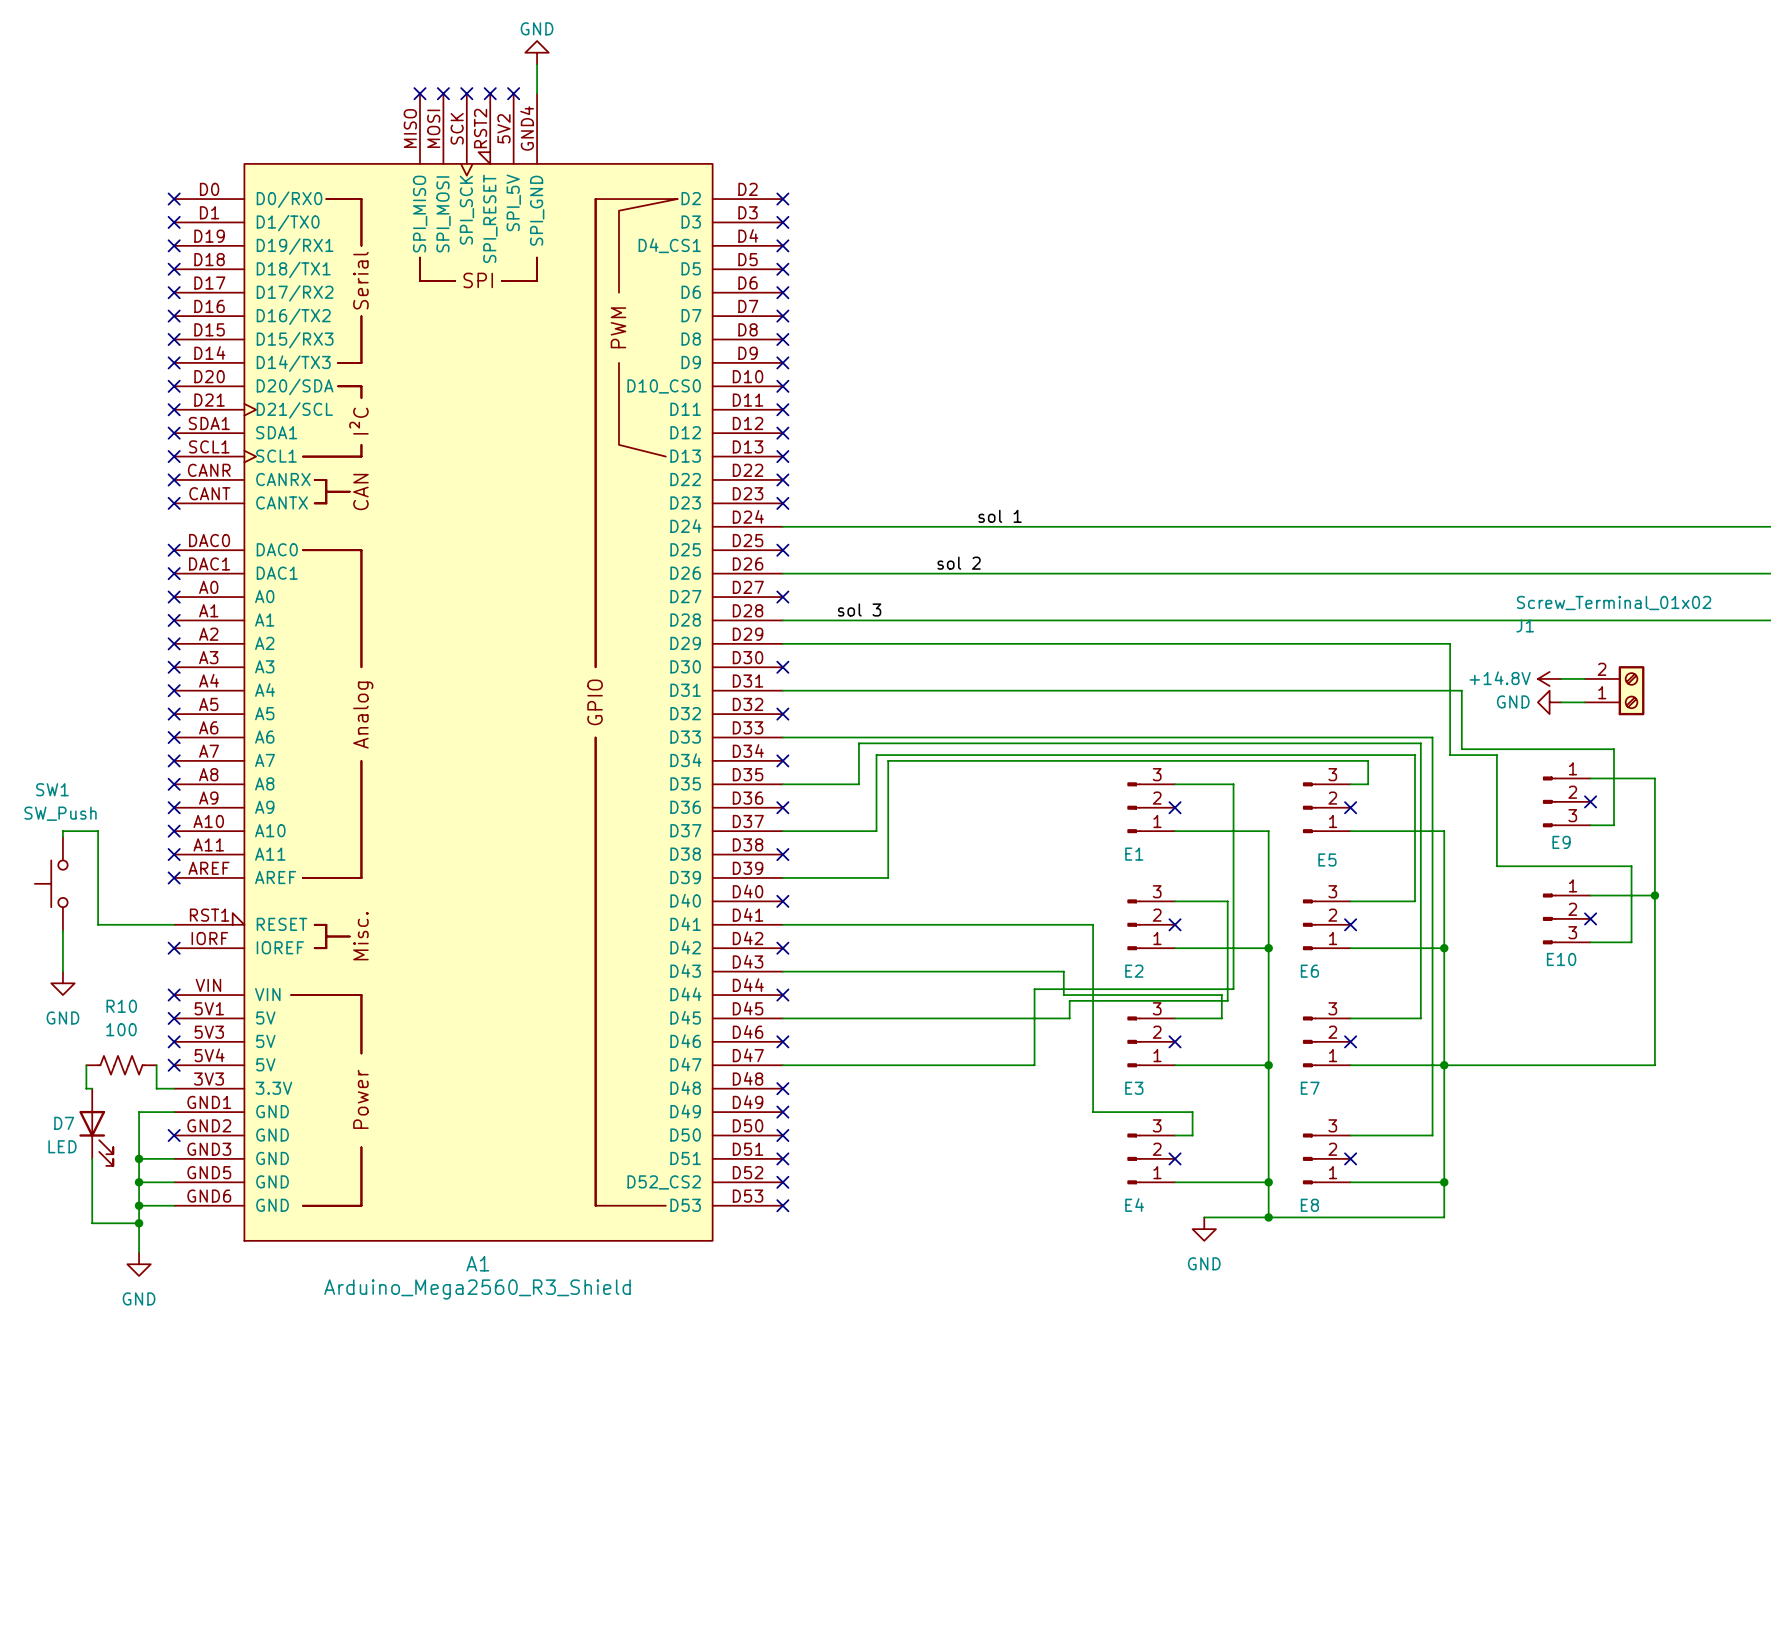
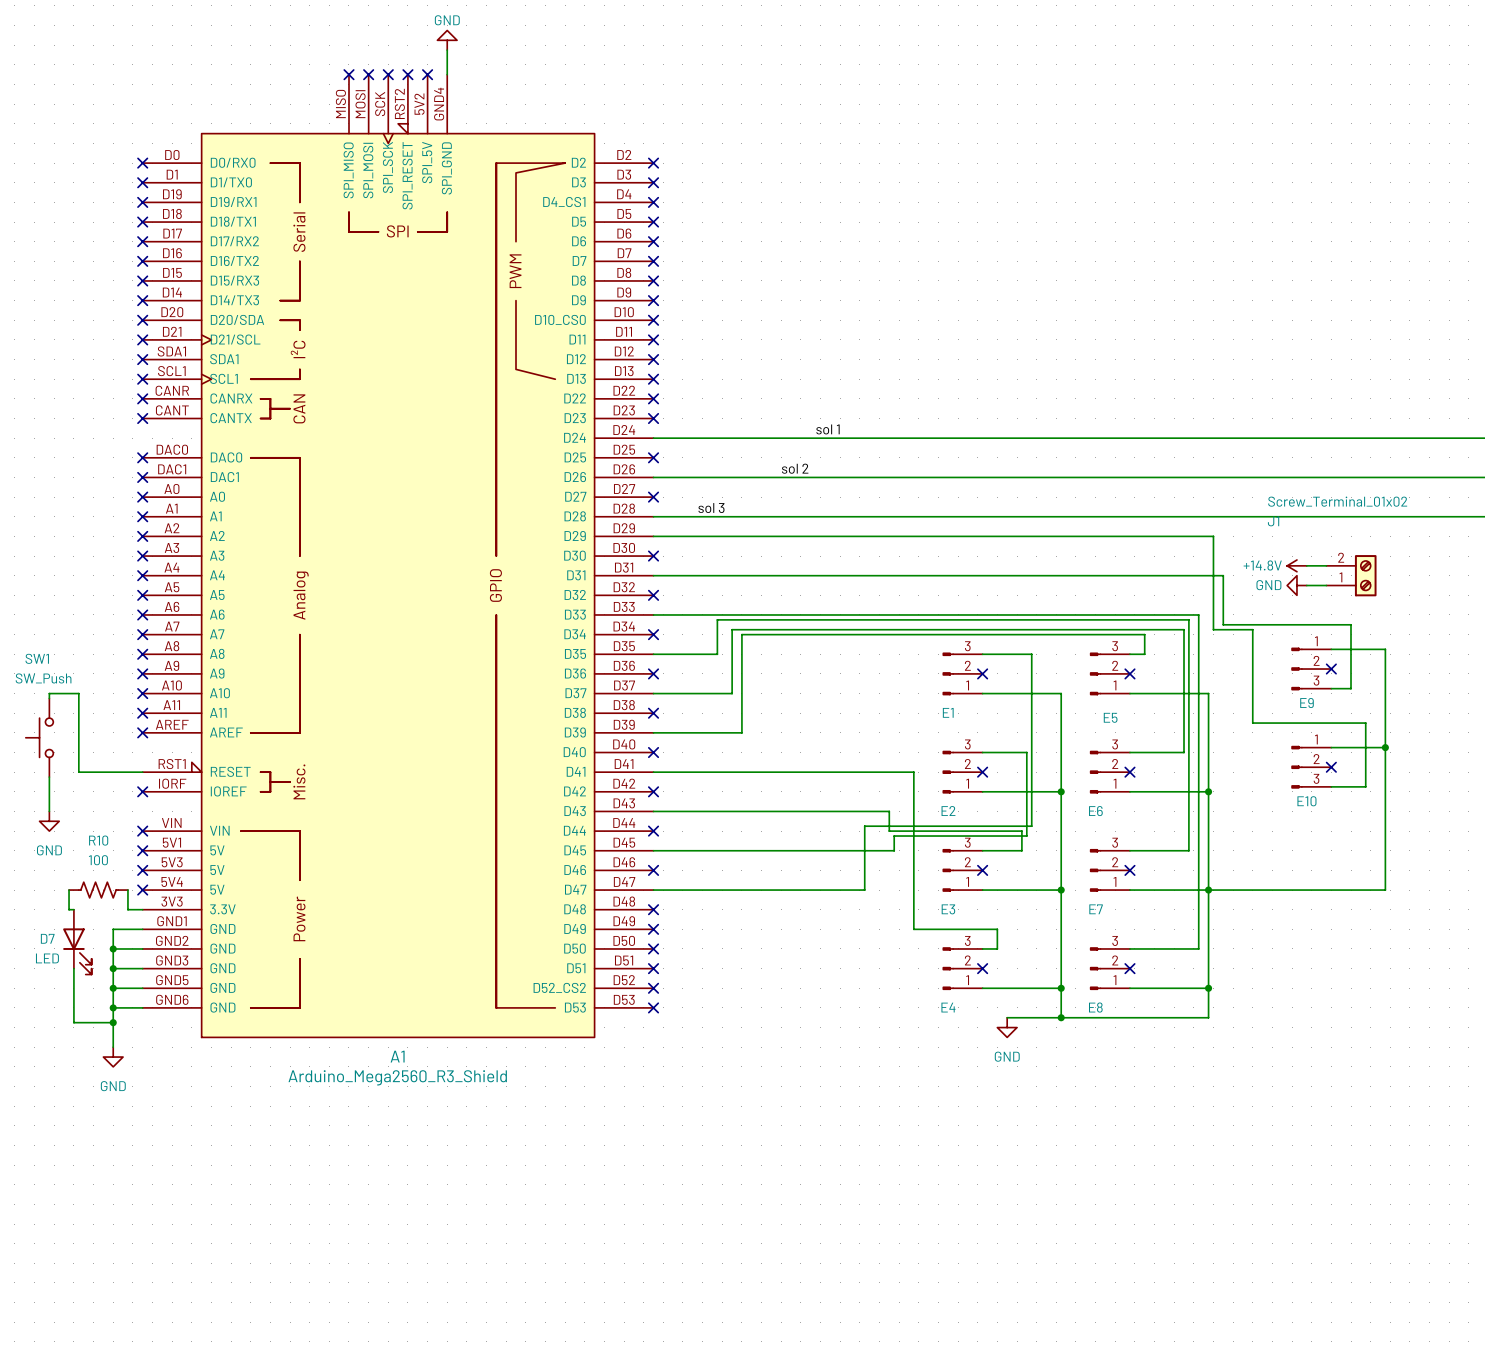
wire: none -> (113, 948) (142, 948)
junction: none -> (113, 948)
no-connect mark: (174, 1135) -> none

